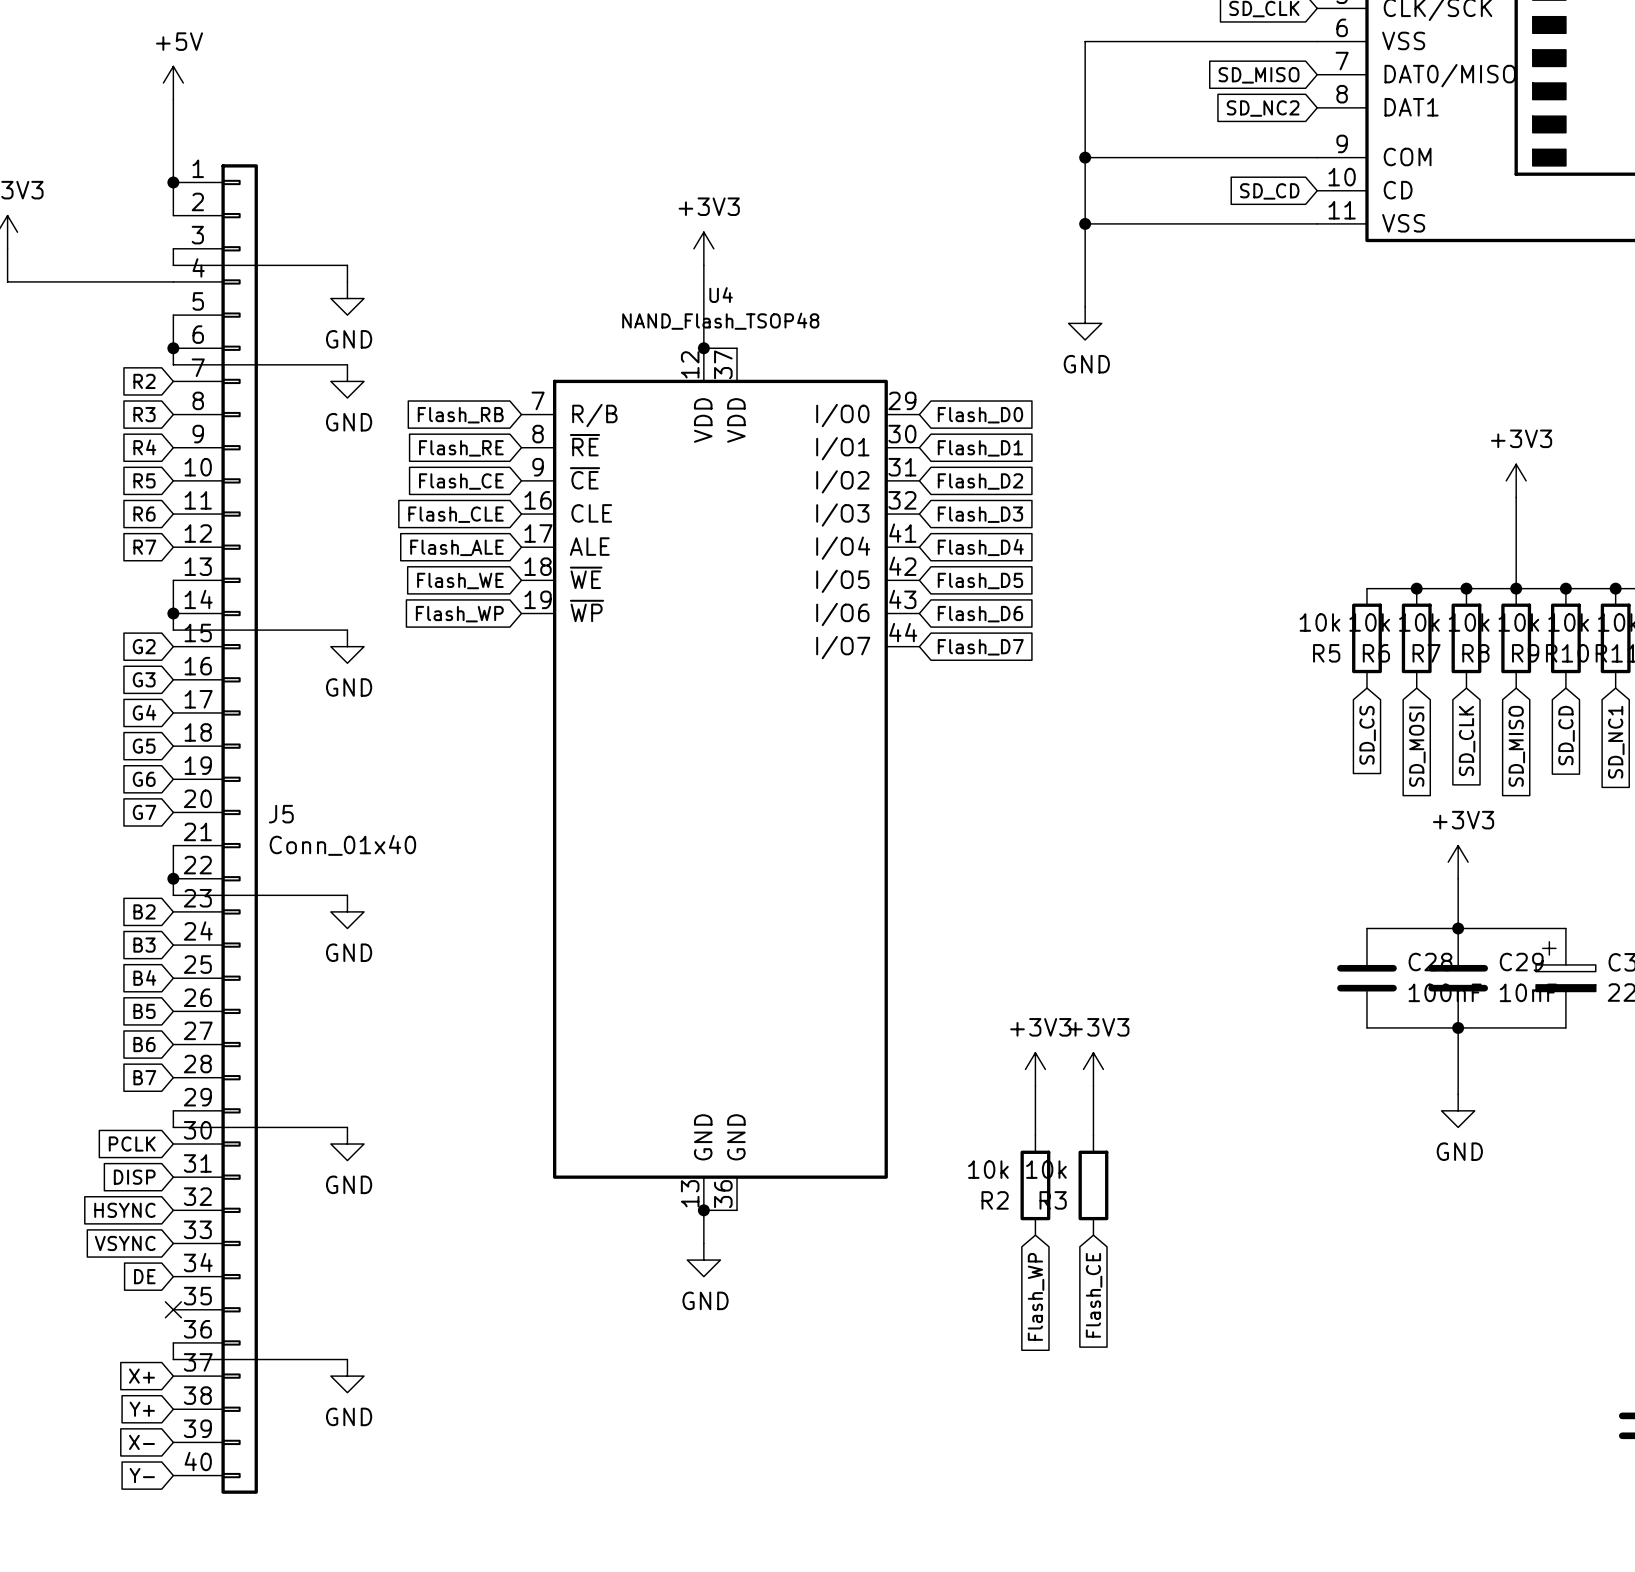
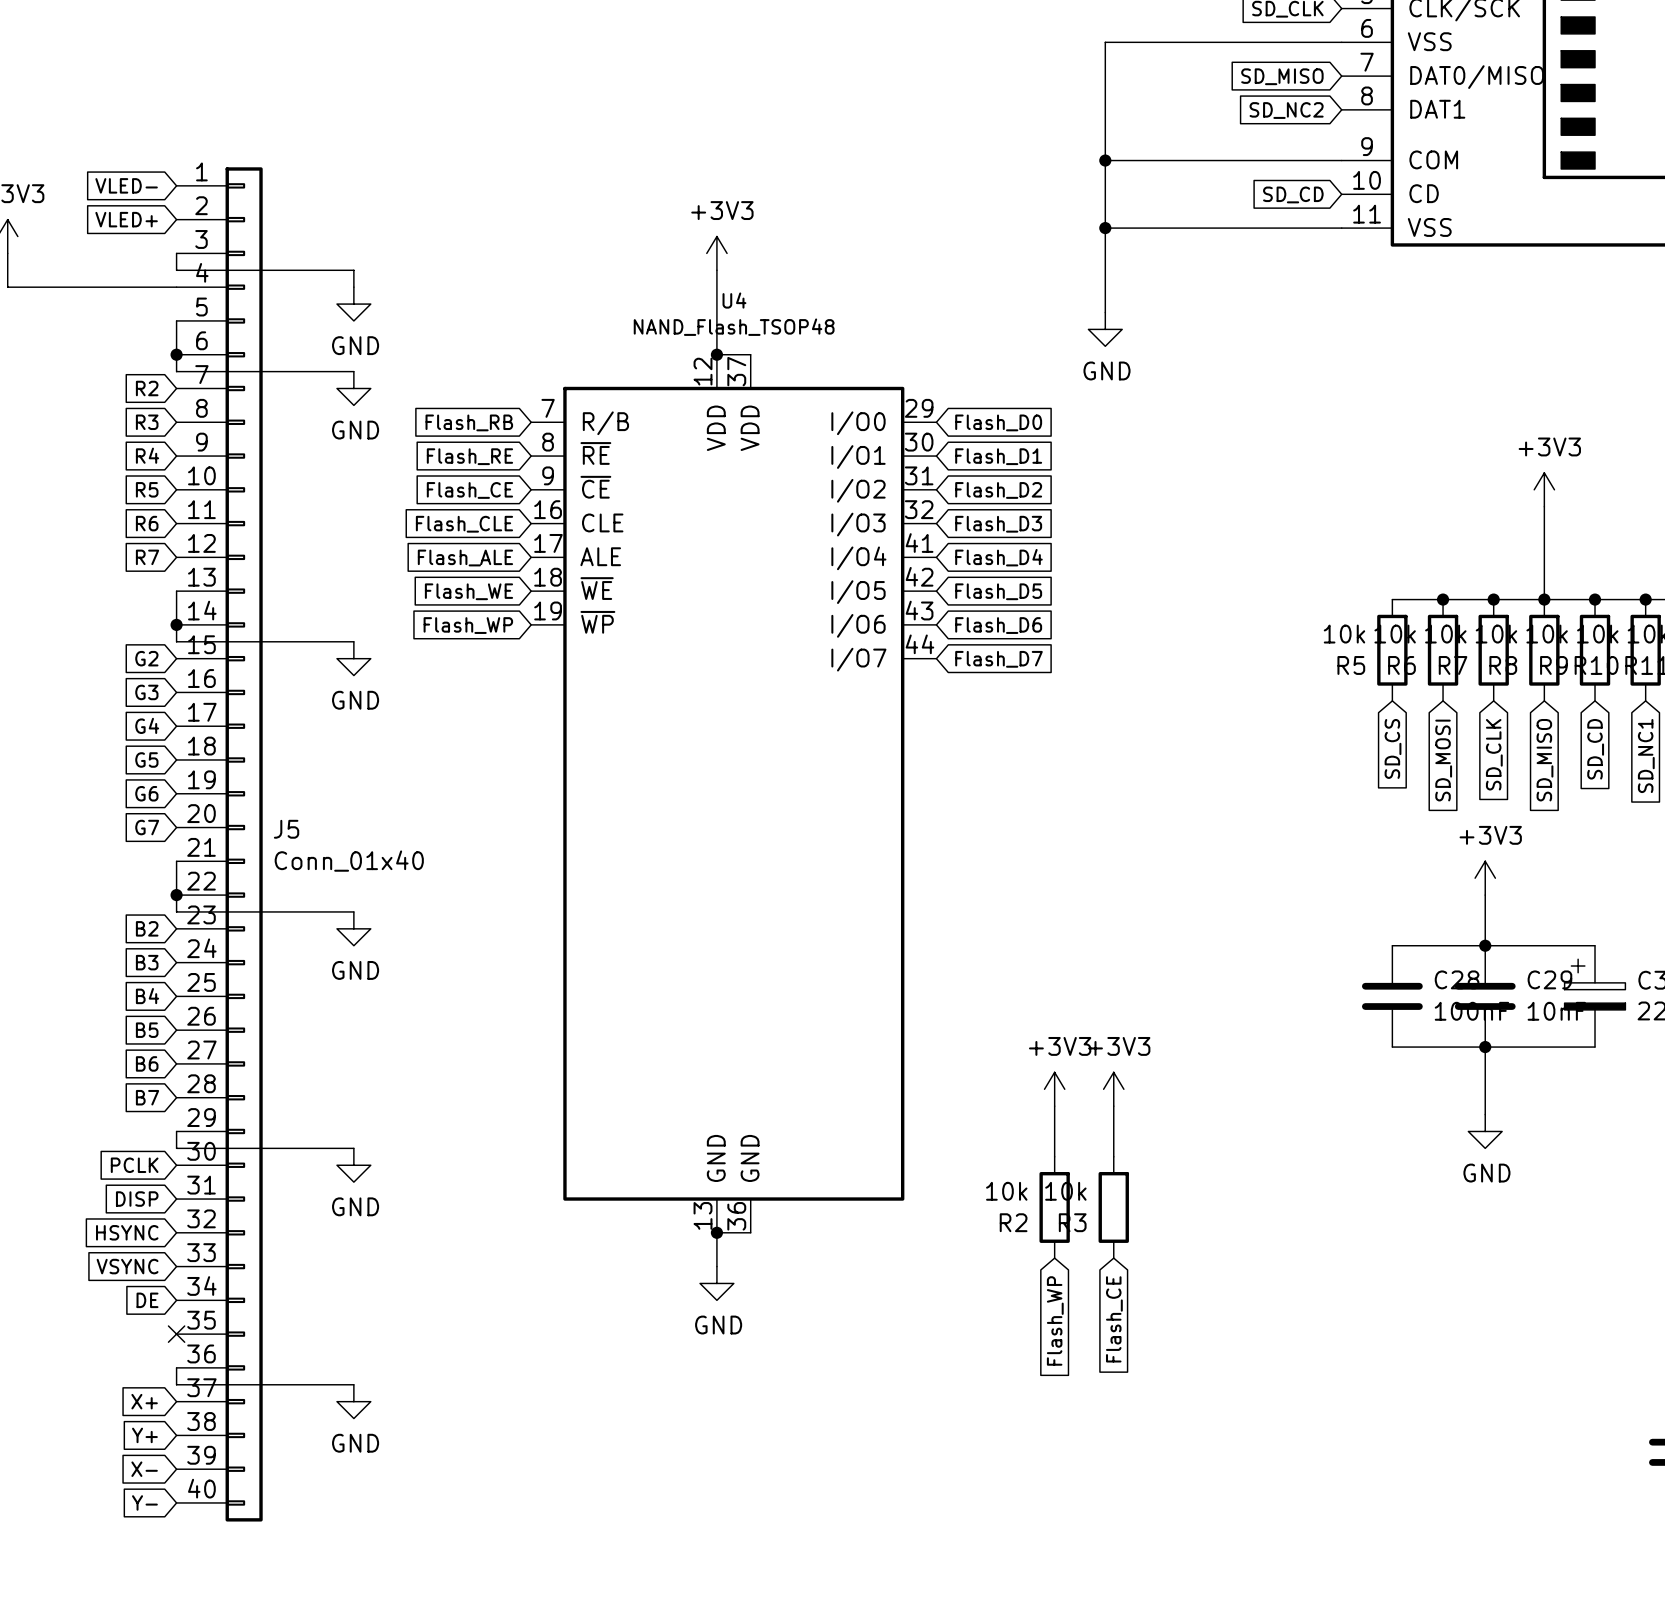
power symbol: +5V (173, 83) -> none
wire: (173, 99) (173, 215) -> none
global label: none -> VLED- (126, 185)
junction: (173, 182) -> none
global label: none -> VLED+ (126, 219)

